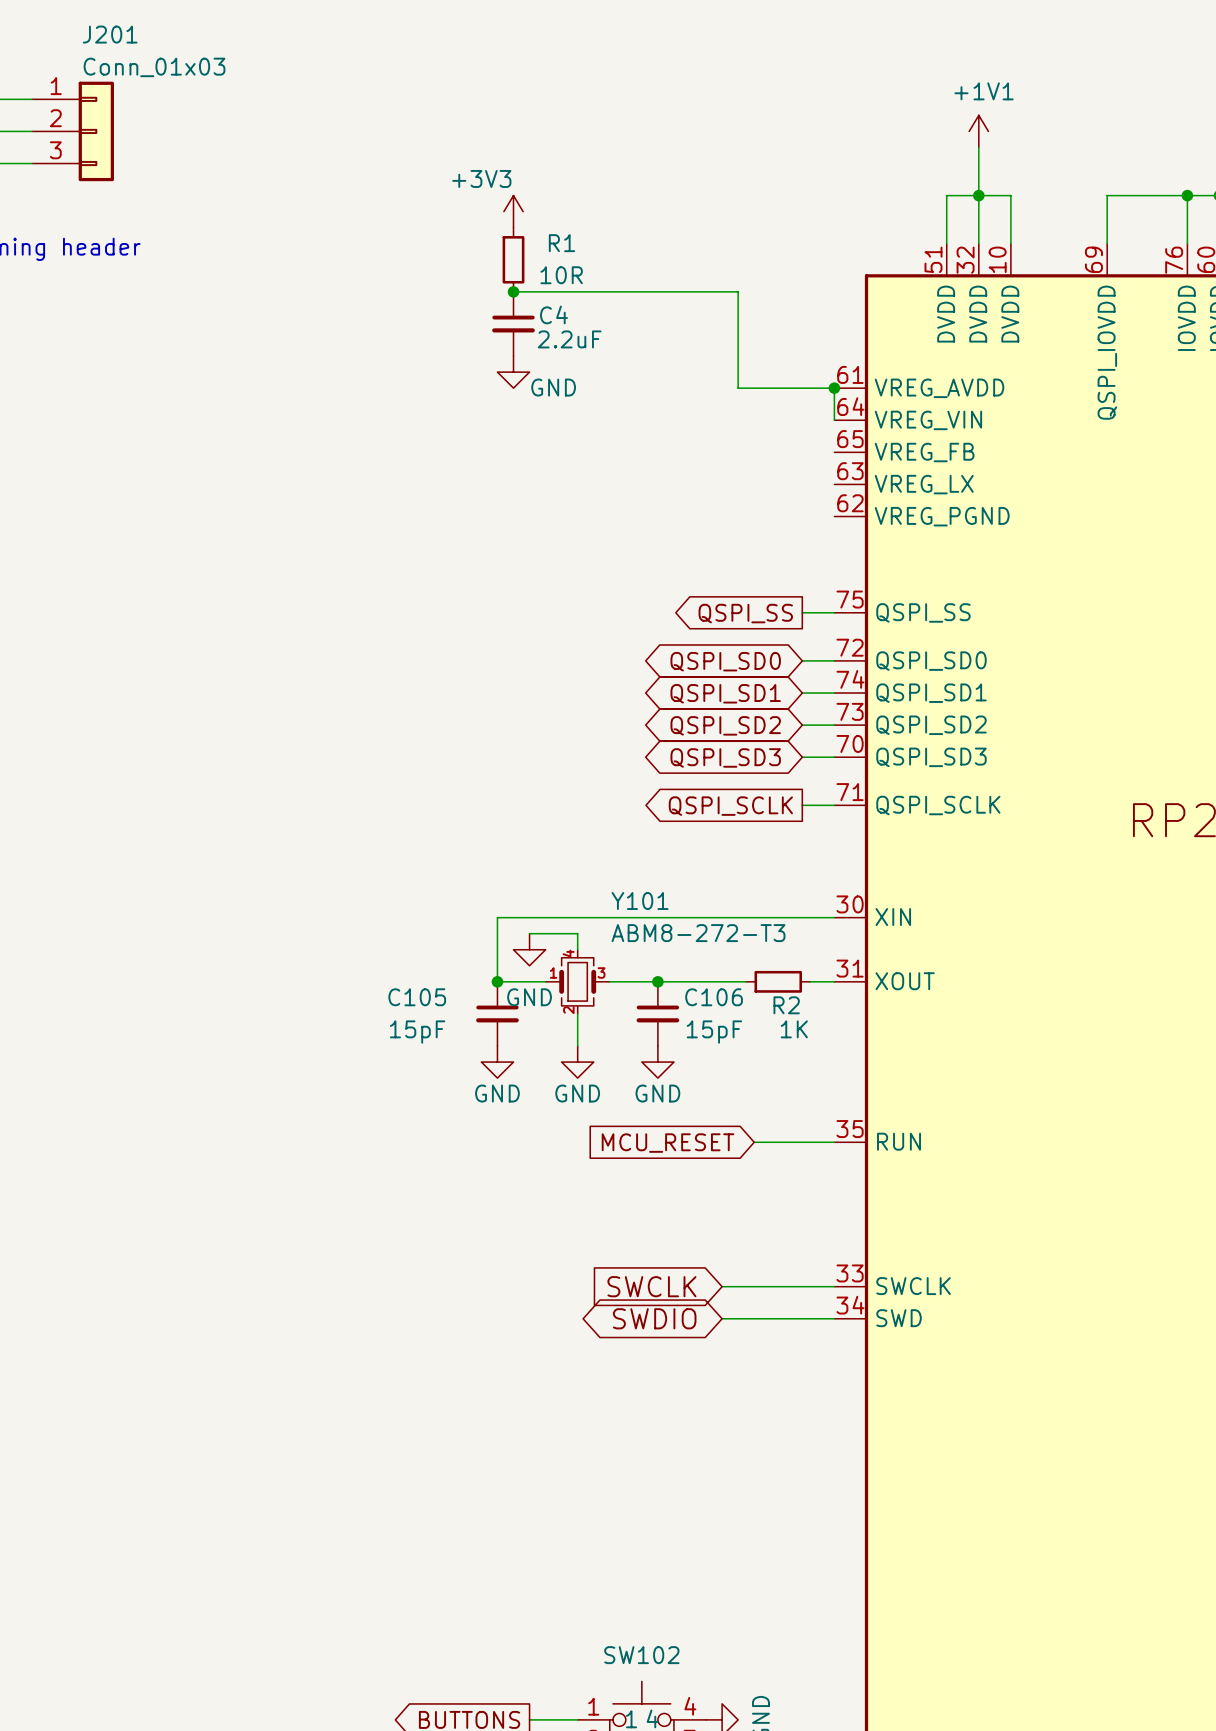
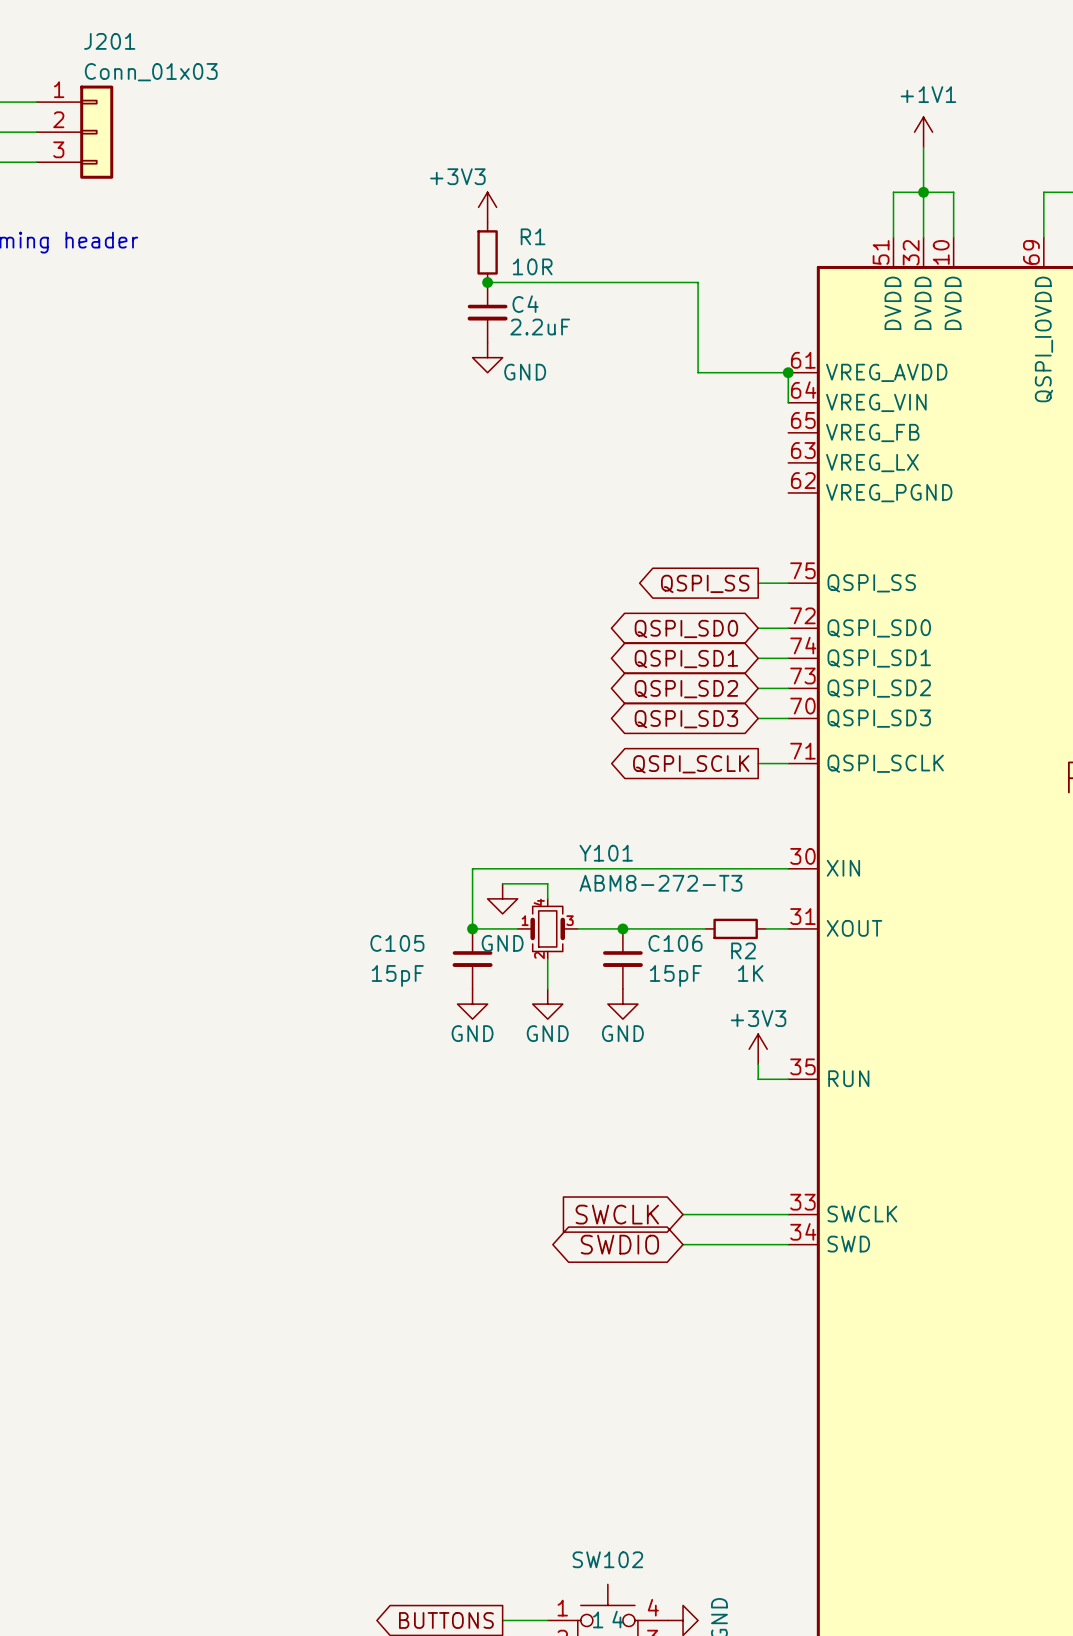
power symbol: none -> +3V3 (758, 1049)
wire: (754, 1142) (802, 1142) -> (758, 1064) (758, 1079)
global label: MCU_RESET (668, 1143) -> none

